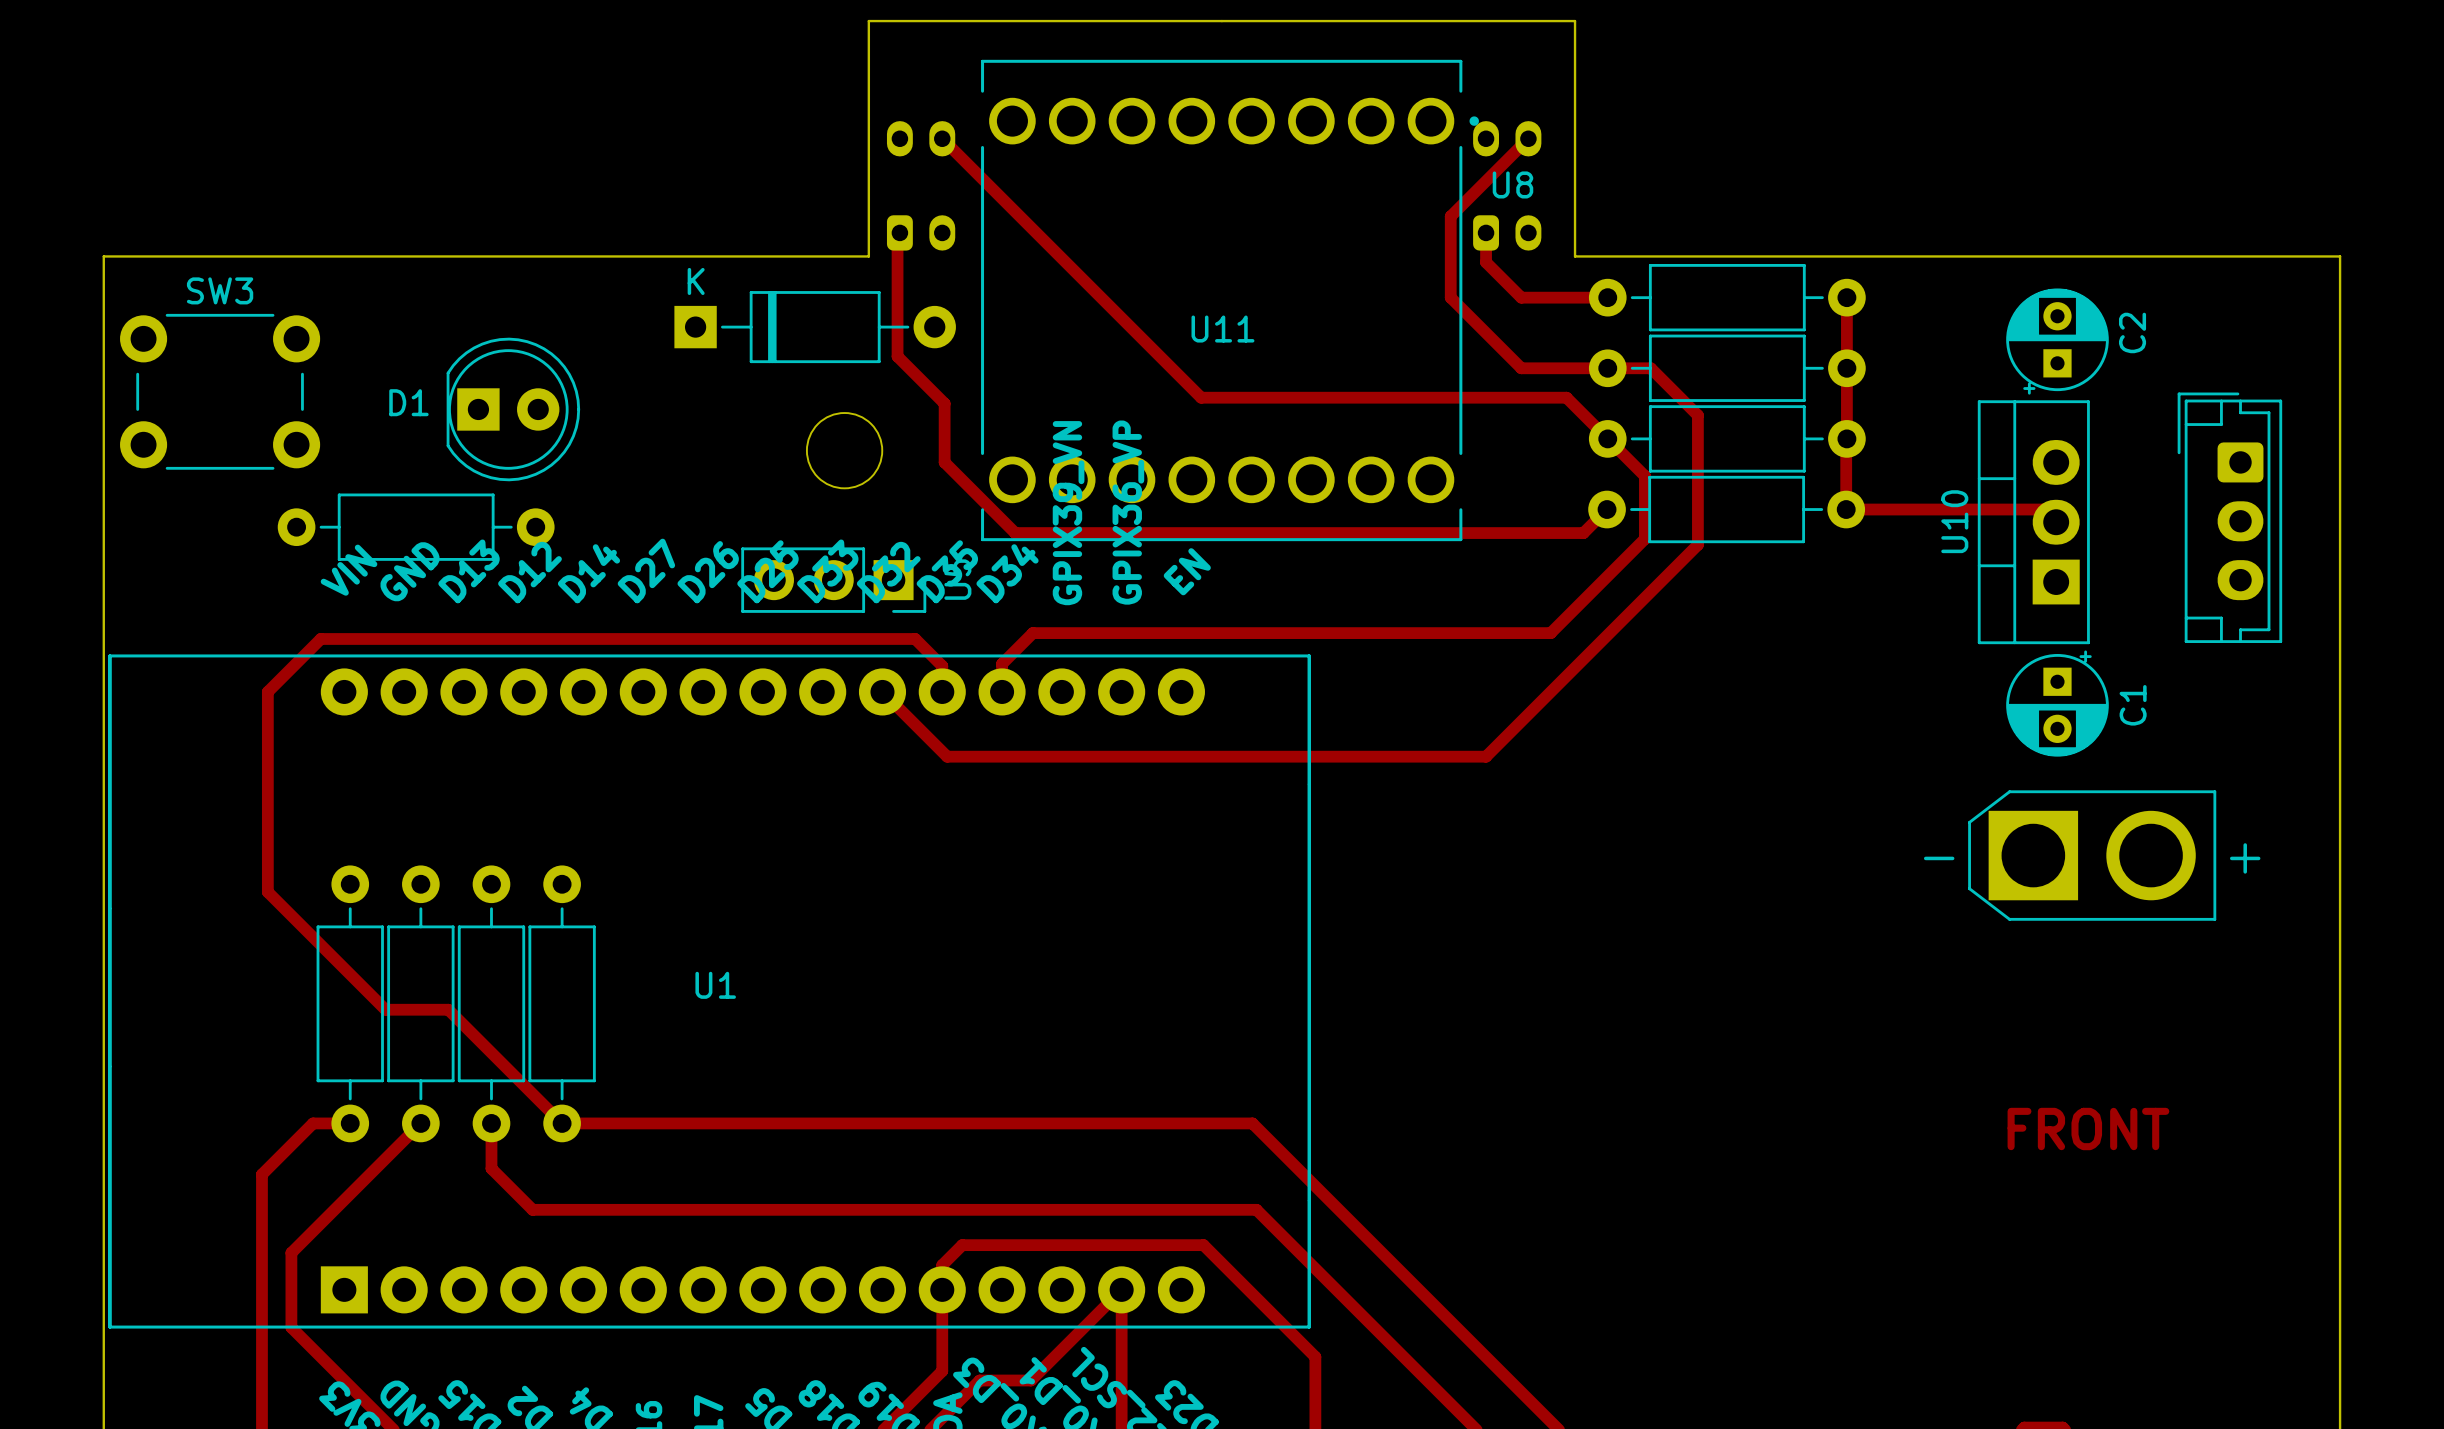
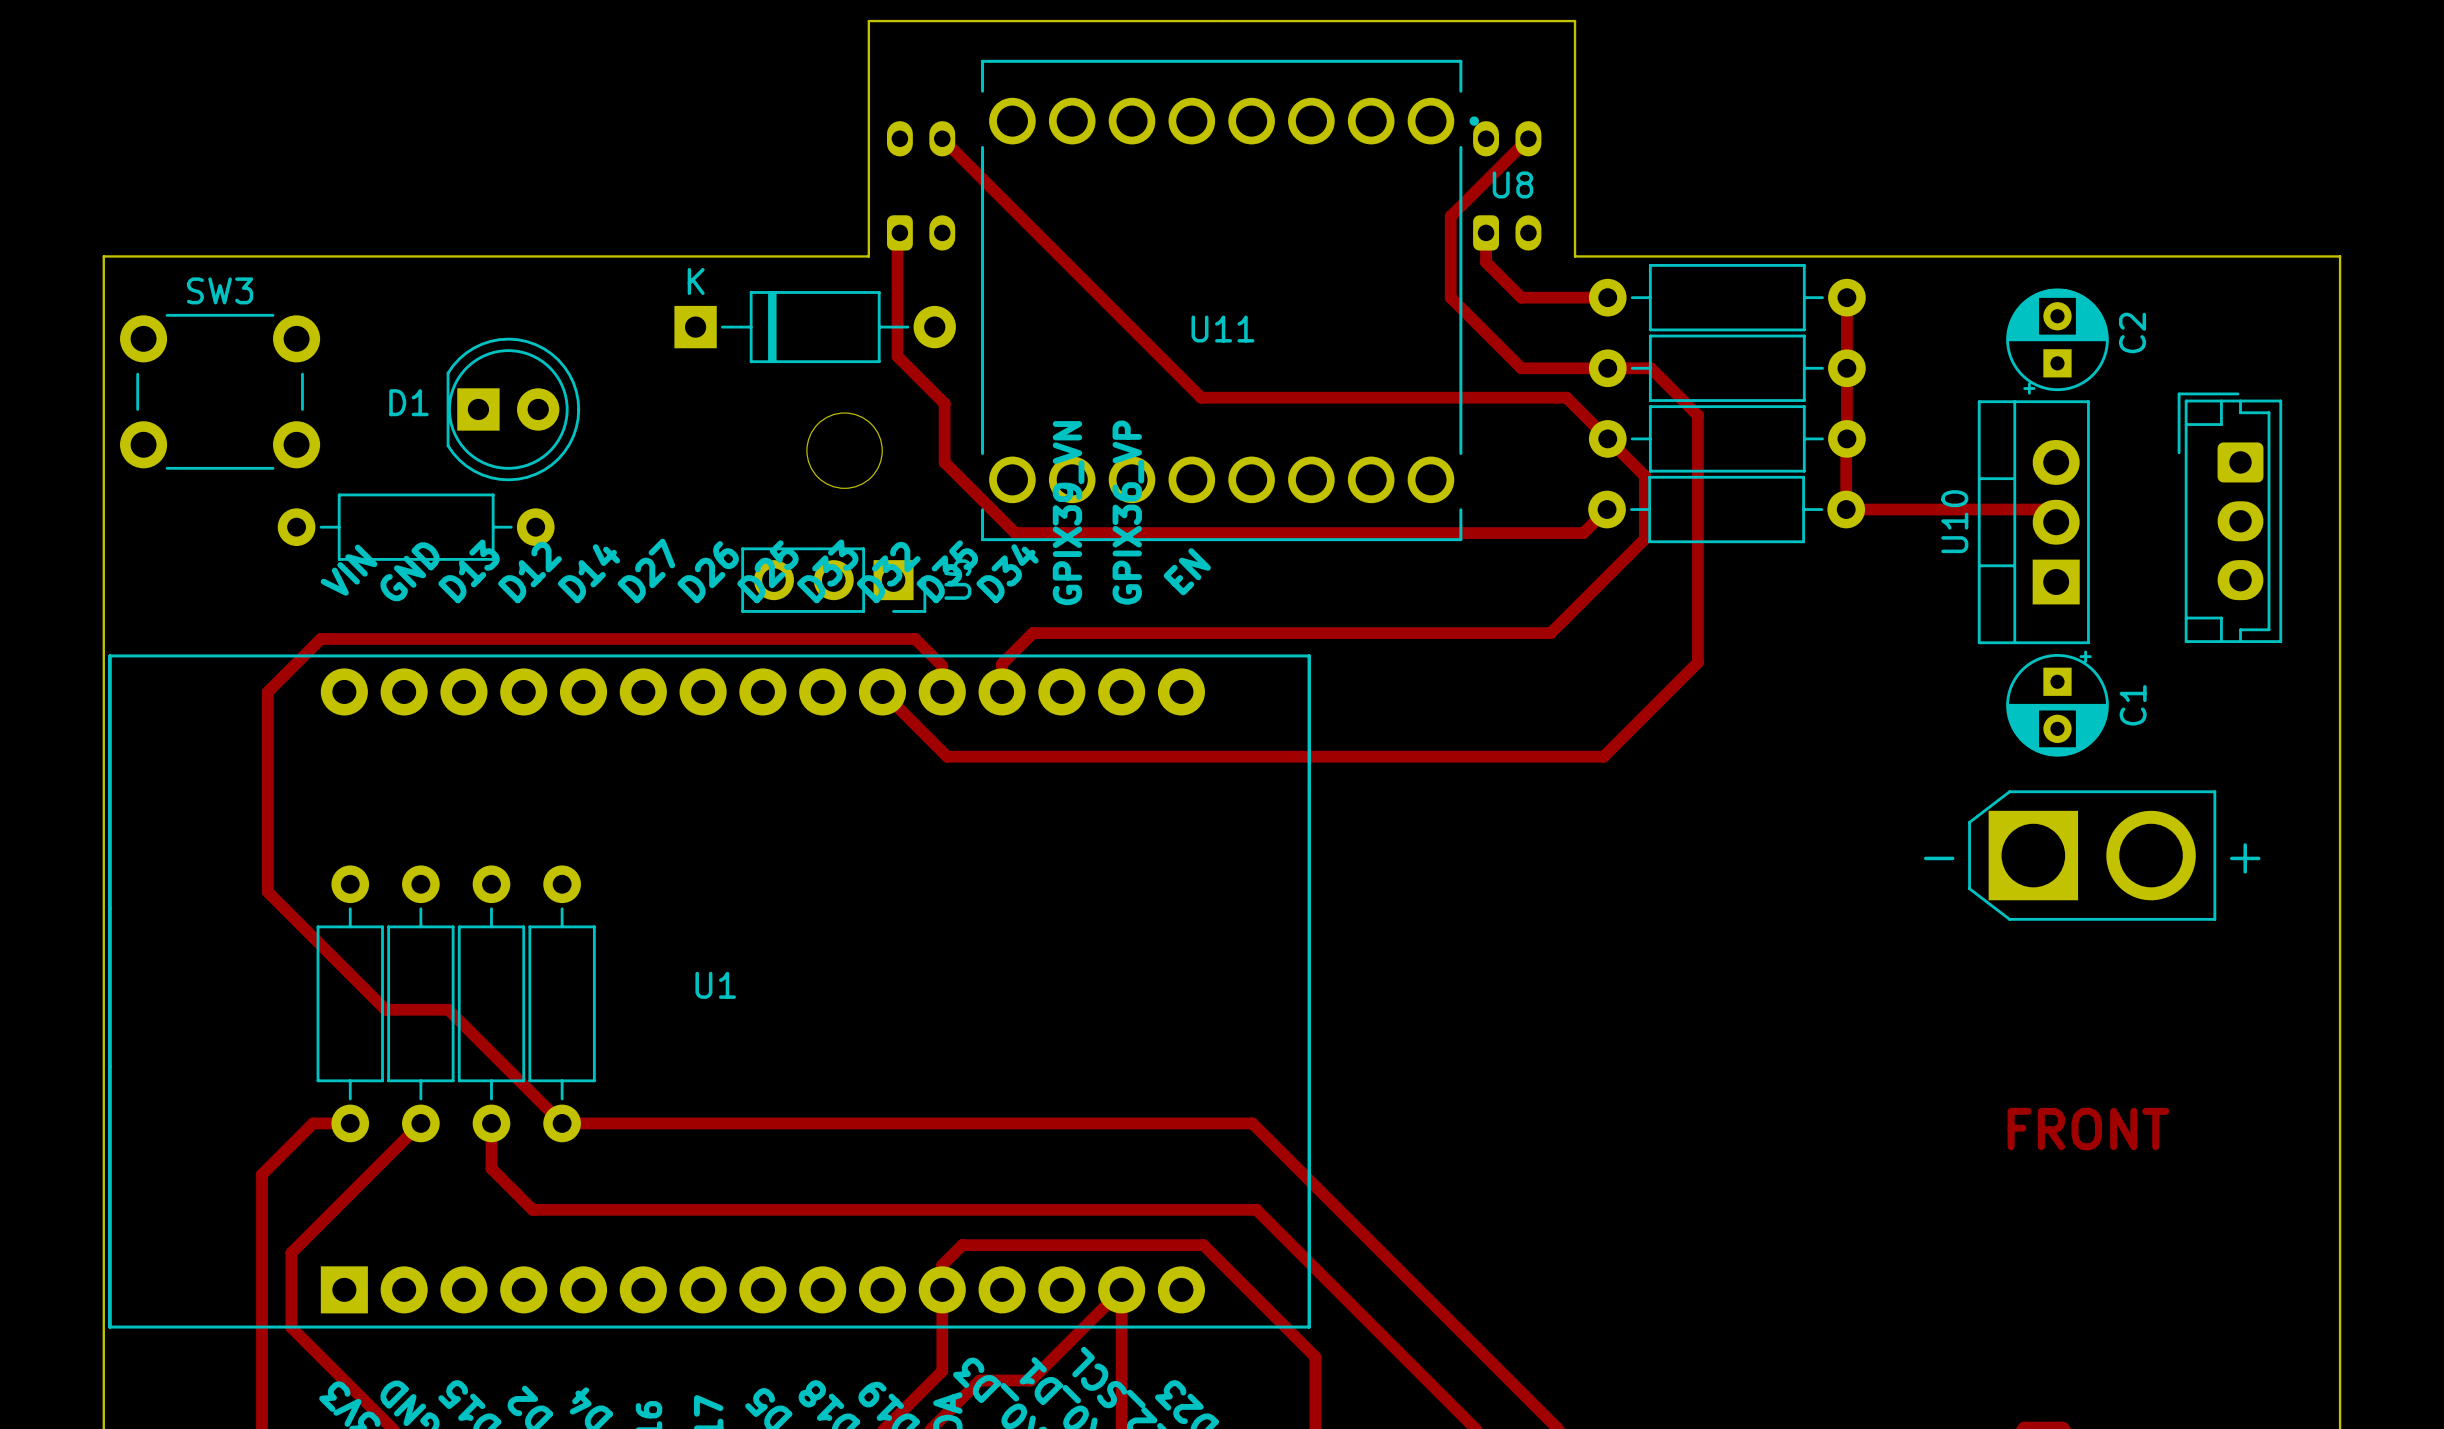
track: (1697, 544) (1486, 756) -> (1697, 544) (1697, 662) (1603, 756) (1486, 756)

